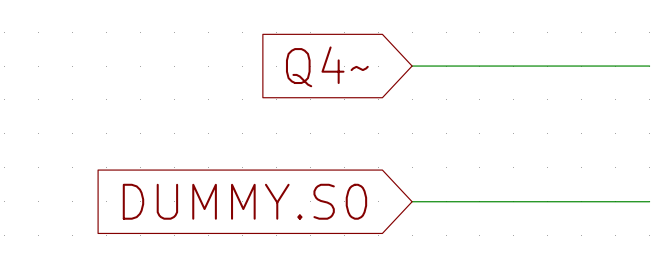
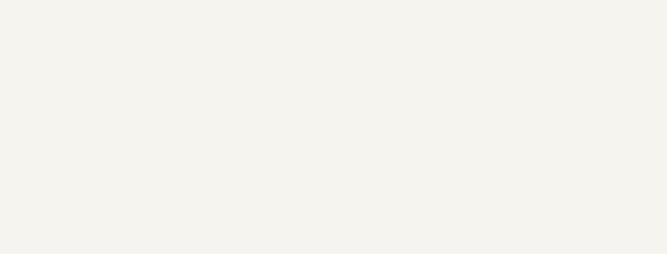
global label: Q4~ (327, 66) -> none
wire: (412, 66) (649, 66) -> none
global label: DUMMY.S0 (244, 201) -> none
wire: (412, 201) (649, 201) -> none

